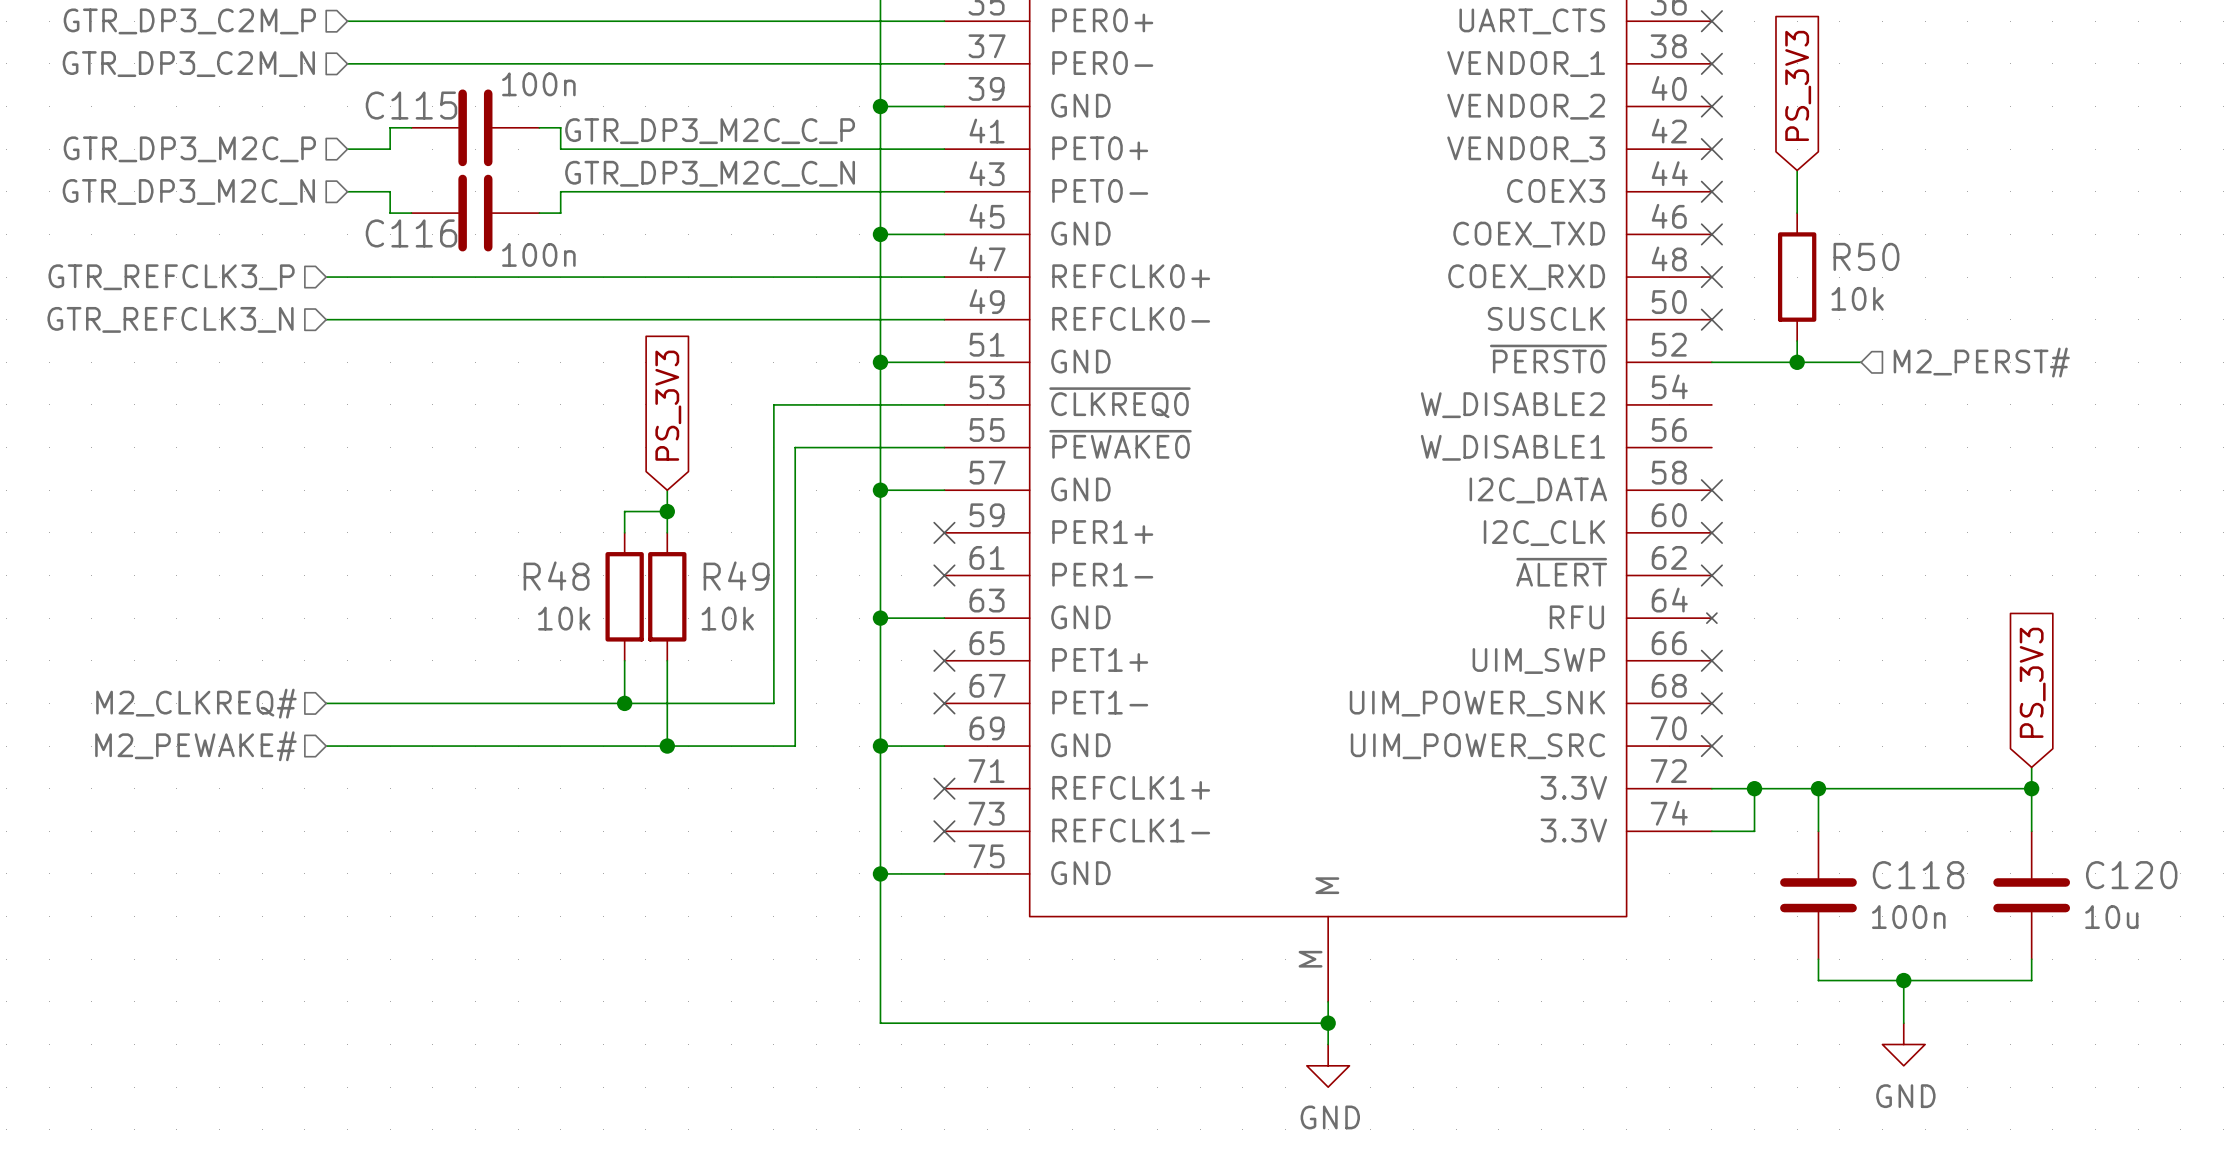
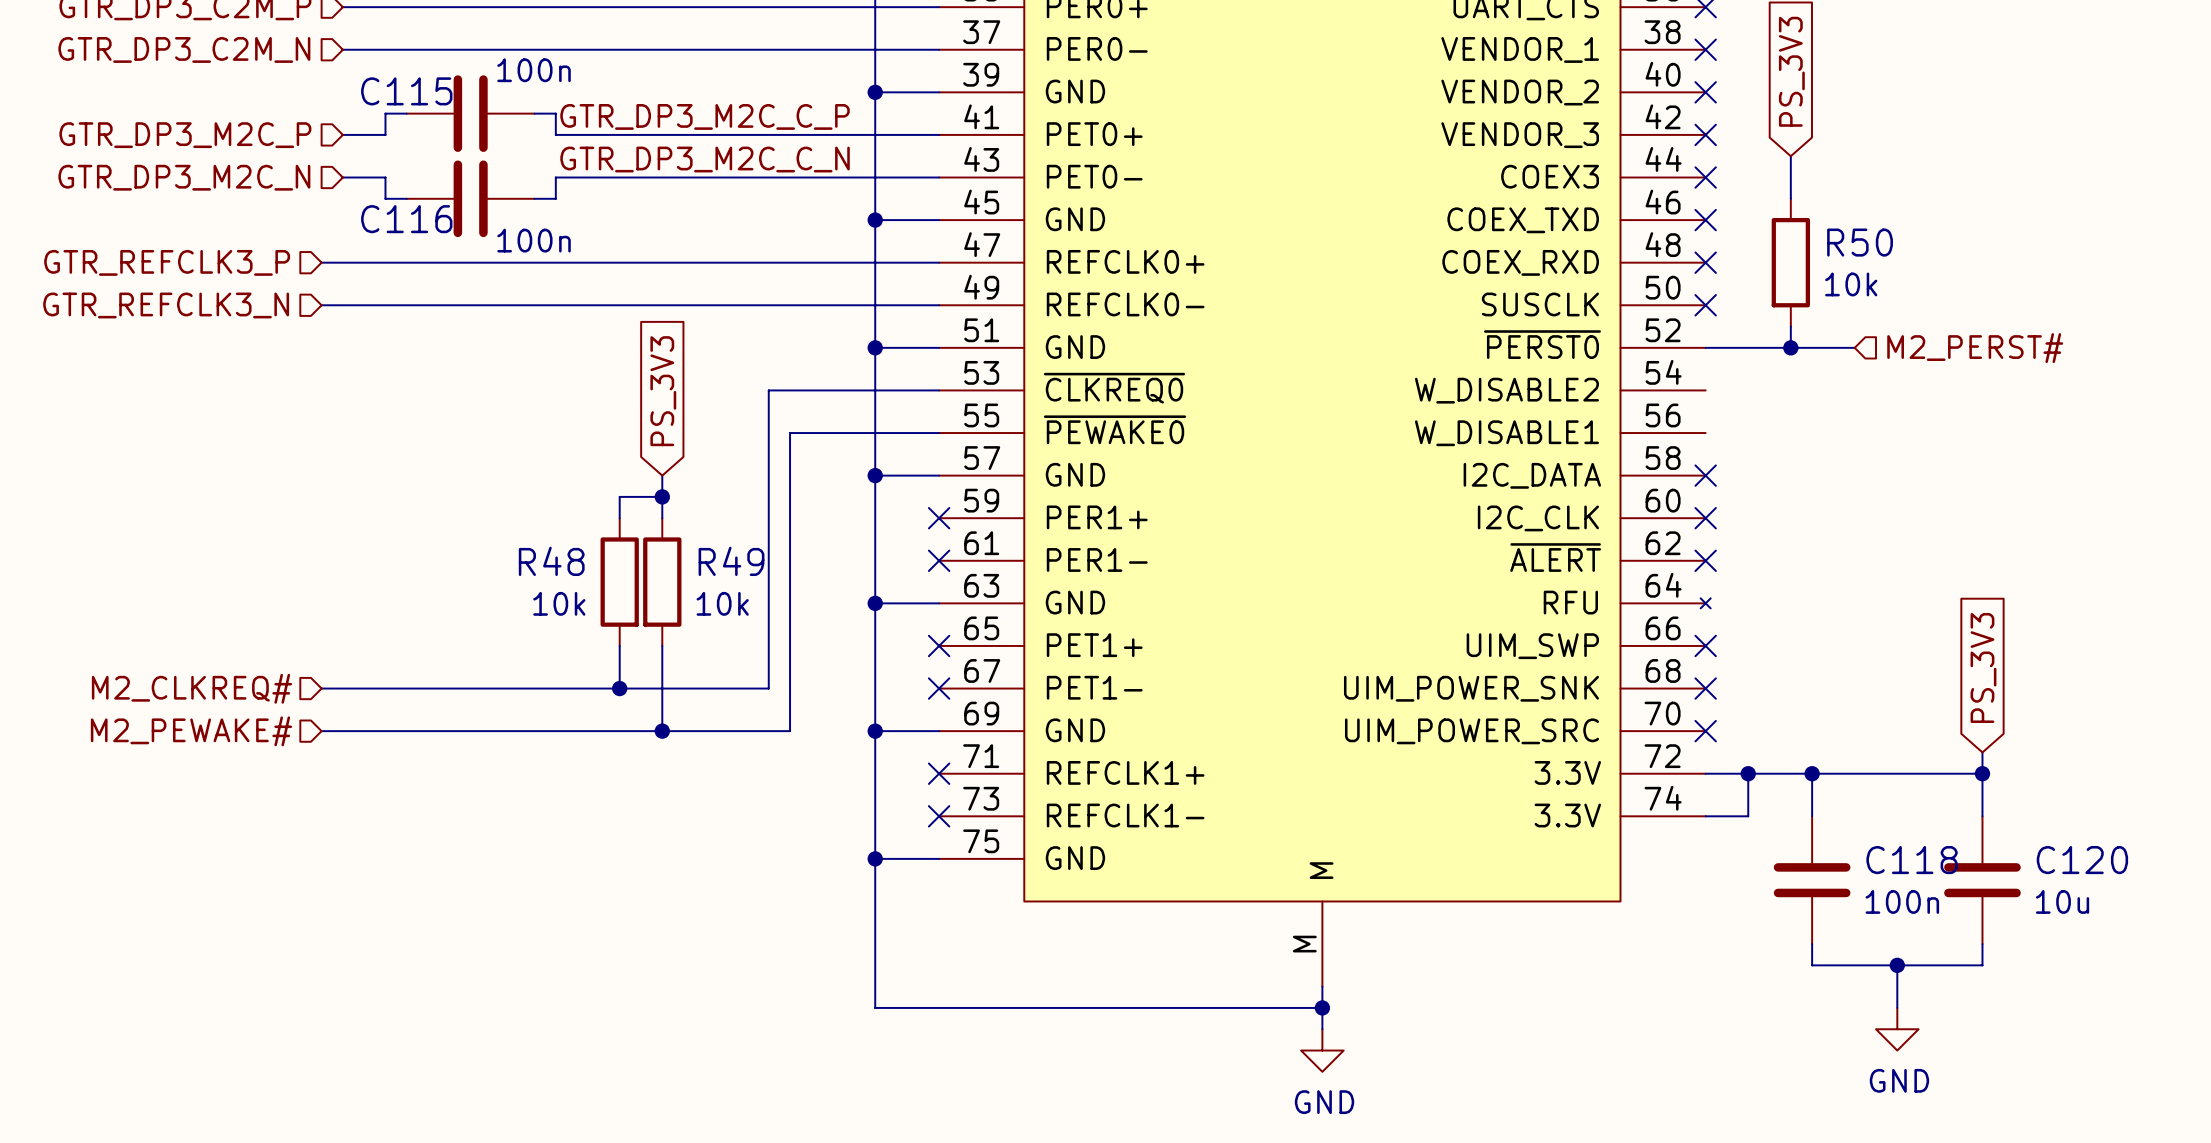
global label position: PS_3V3 (2032, 682) -> PS_3V3 (1983, 667)
wire: (2031, 767) (2031, 831) -> (1982, 752) (1982, 816)
wire: (1989, 788) (2031, 788) -> none
junction position: (2031, 788) -> (1982, 773)
C120 position: (2031, 895) -> (1982, 880)
wire: (2031, 959) (2031, 980) (1989, 980) -> (1982, 944) (1982, 965)

